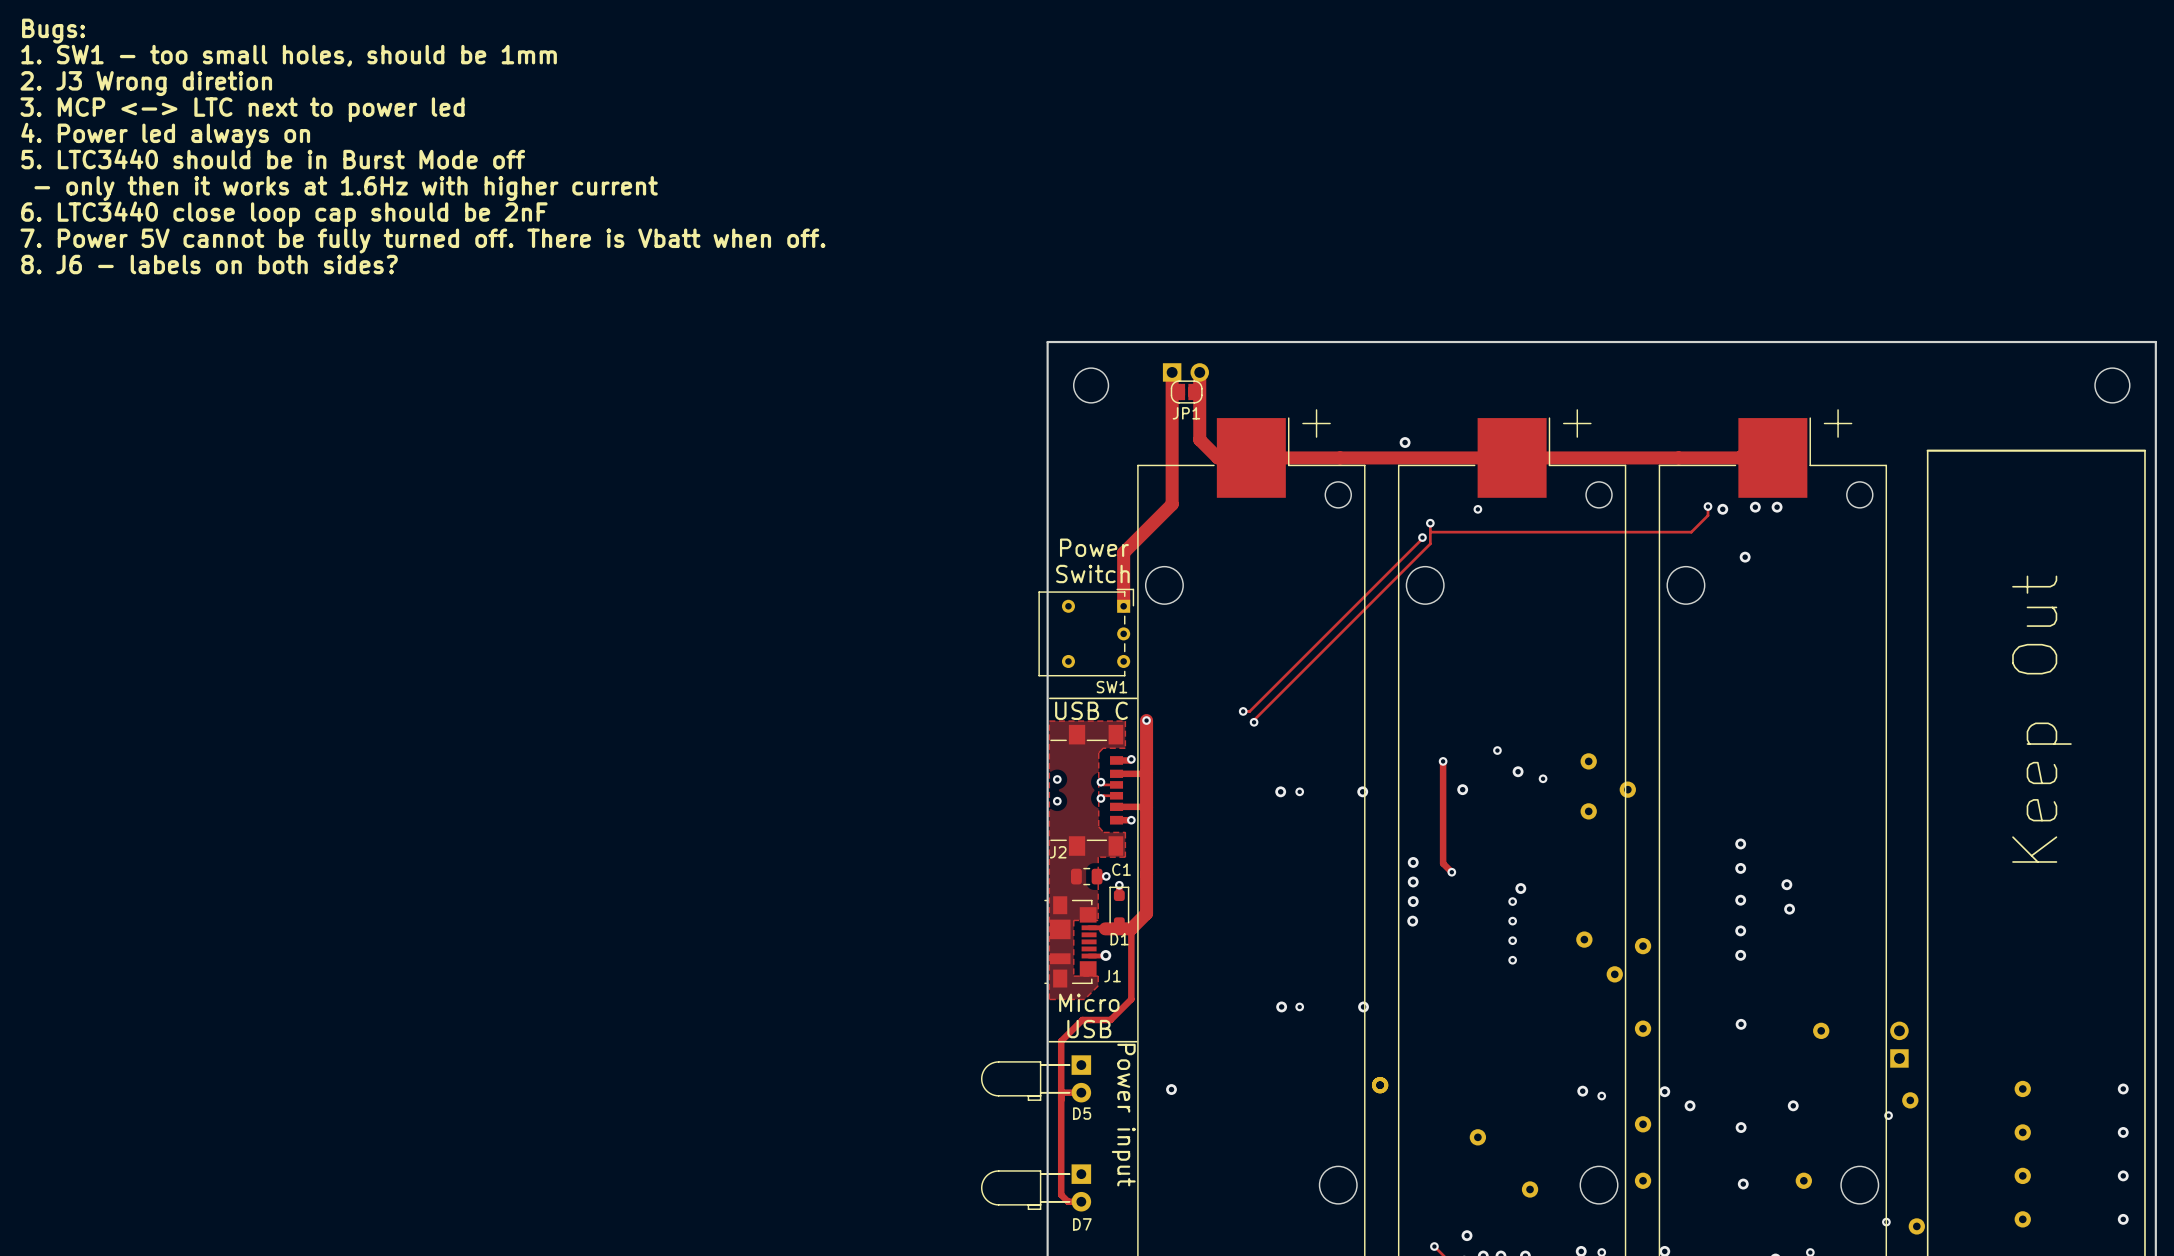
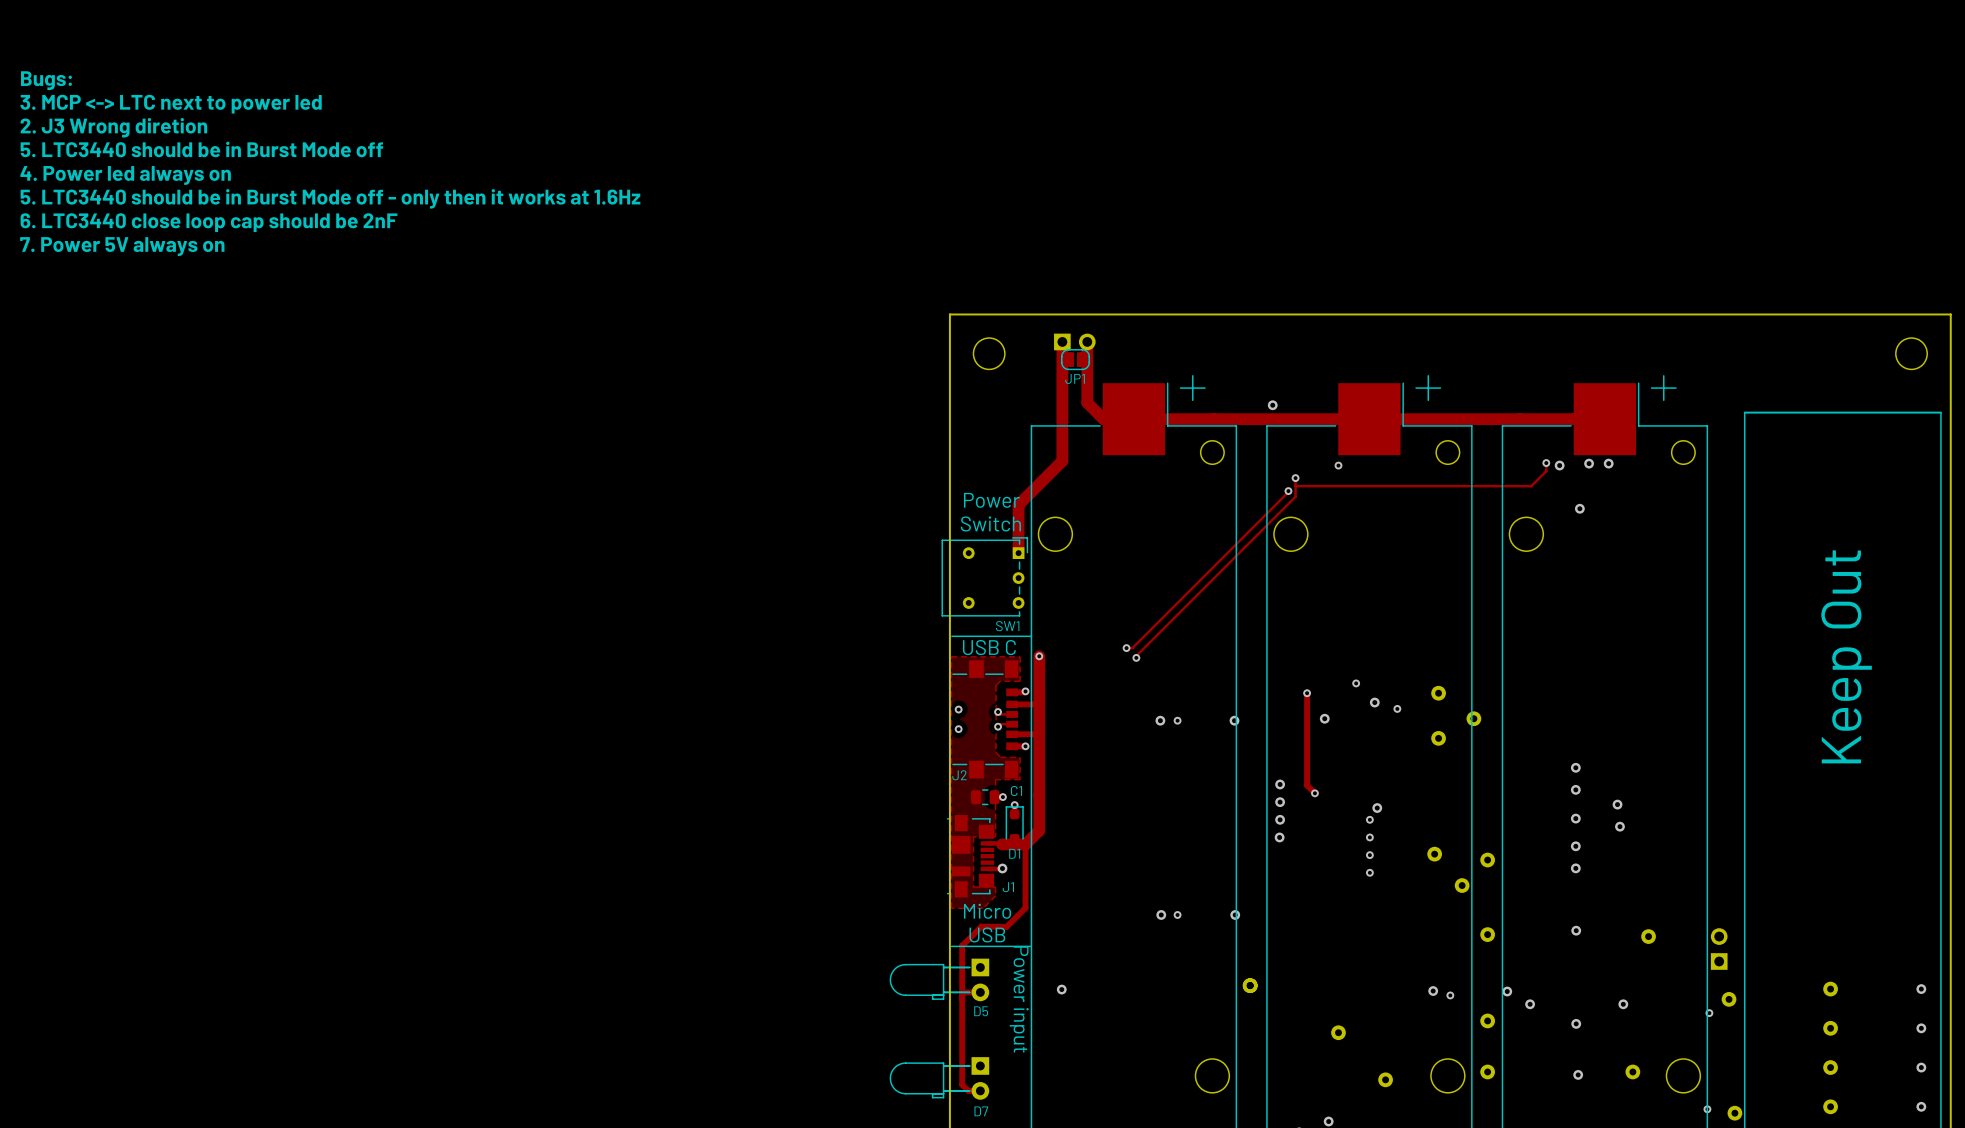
text: Bugs: (53, 31) -> none
text: 1. SW1 - too small holes, should be 1mm (289, 55) -> none
text: 2. J3 Wrong diretion (146, 83) -> Bugs: (46, 80)
text: 4. Power led always on (165, 135) -> 2. J3 Wrong diretion (113, 127)
text: - only then it works at 1.6Hz with higher current (346, 188) -> 4. Power led always on (125, 175)
text: 6. LTC3440 close loop cap should be 2nF (284, 214) -> 5. LTC3440 should be in Burst Mode off - only then it works at 1.6Hz (330, 198)
text: 7. Power 5V cannot be fully turned off. There is Vbatt when off. (422, 240) -> 6. LTC3440 close loop cap should be 2nF (209, 222)
text: 8. J6 - labels on both sides? (209, 264) -> 7. Power 5V always on (122, 246)

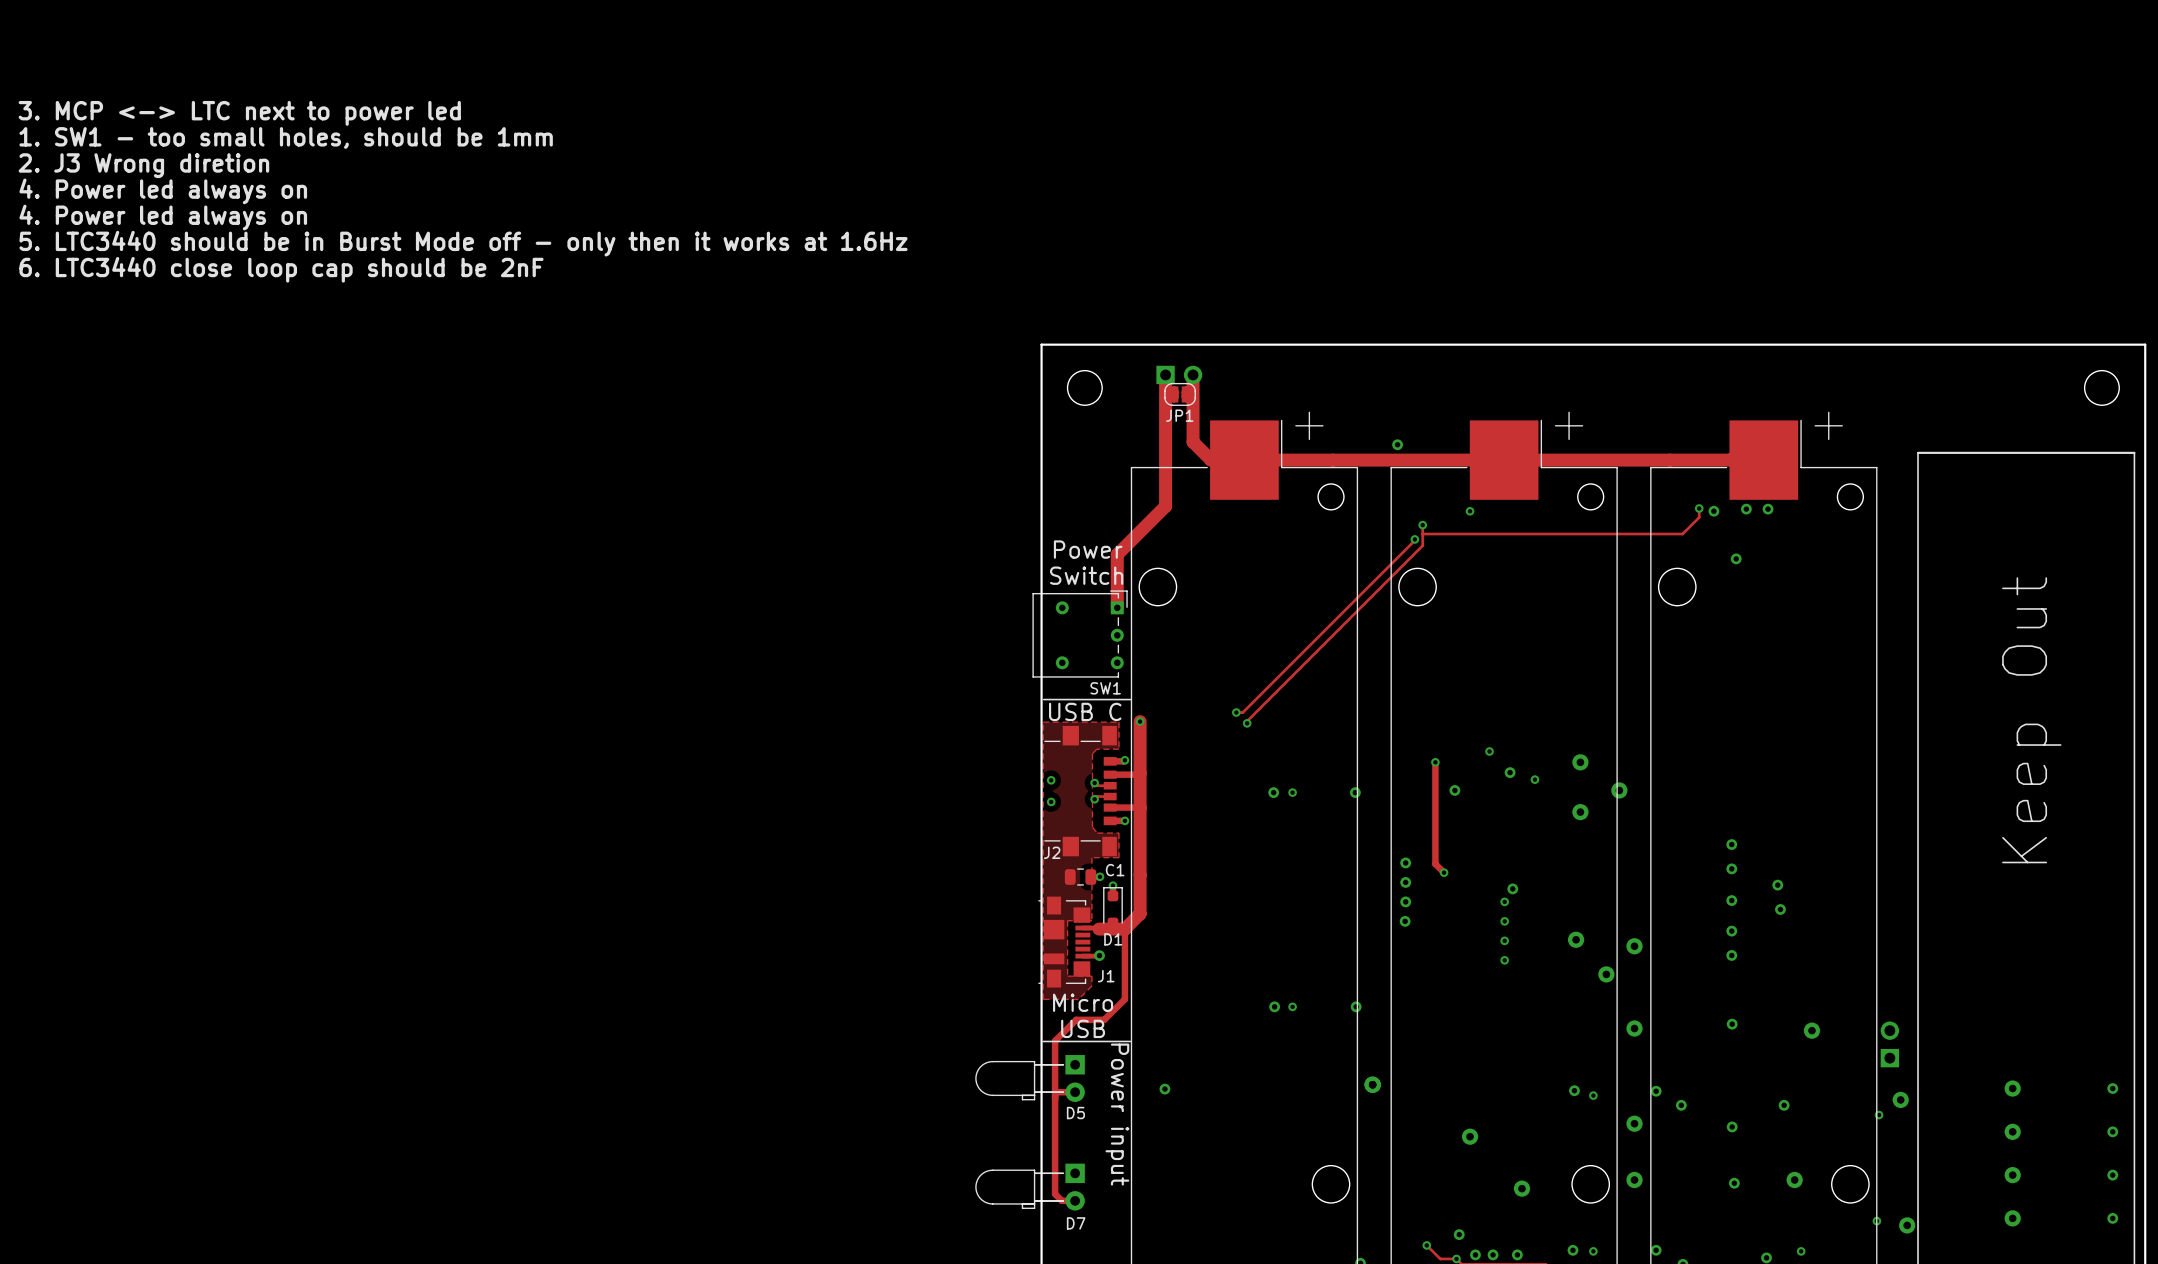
text: Bugs: (46, 80) -> none
text: 2. J3 Wrong diretion (113, 127) -> 1. SW1 - too small holes, should be 1mm (286, 137)
text: 5. LTC3440 should be in Burst Mode off (201, 149) -> 2. J3 Wrong diretion (143, 165)
text: 5. LTC3440 should be in Burst Mode off - only then it works at 1.6Hz (330, 198) -> 4. Power led always on (163, 217)
text: 6. LTC3440 close loop cap should be 2nF (209, 222) -> 5. LTC3440 should be in Burst Mode off - only then it works at 1.6Hz (463, 243)
text: 7. Power 5V always on (122, 246) -> 6. LTC3440 close loop cap should be 2nF (281, 269)

